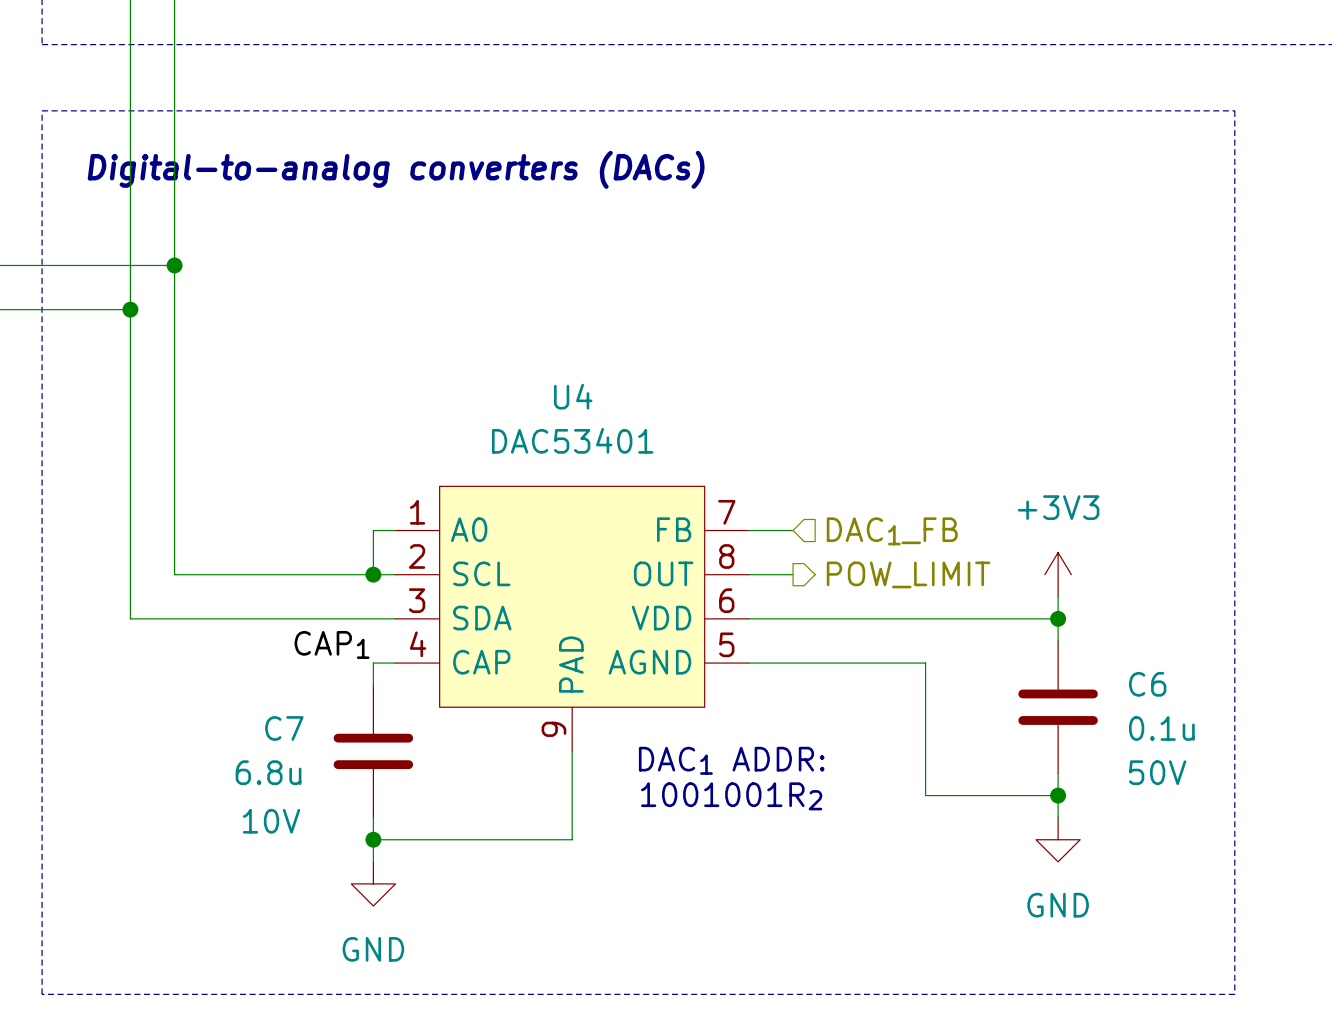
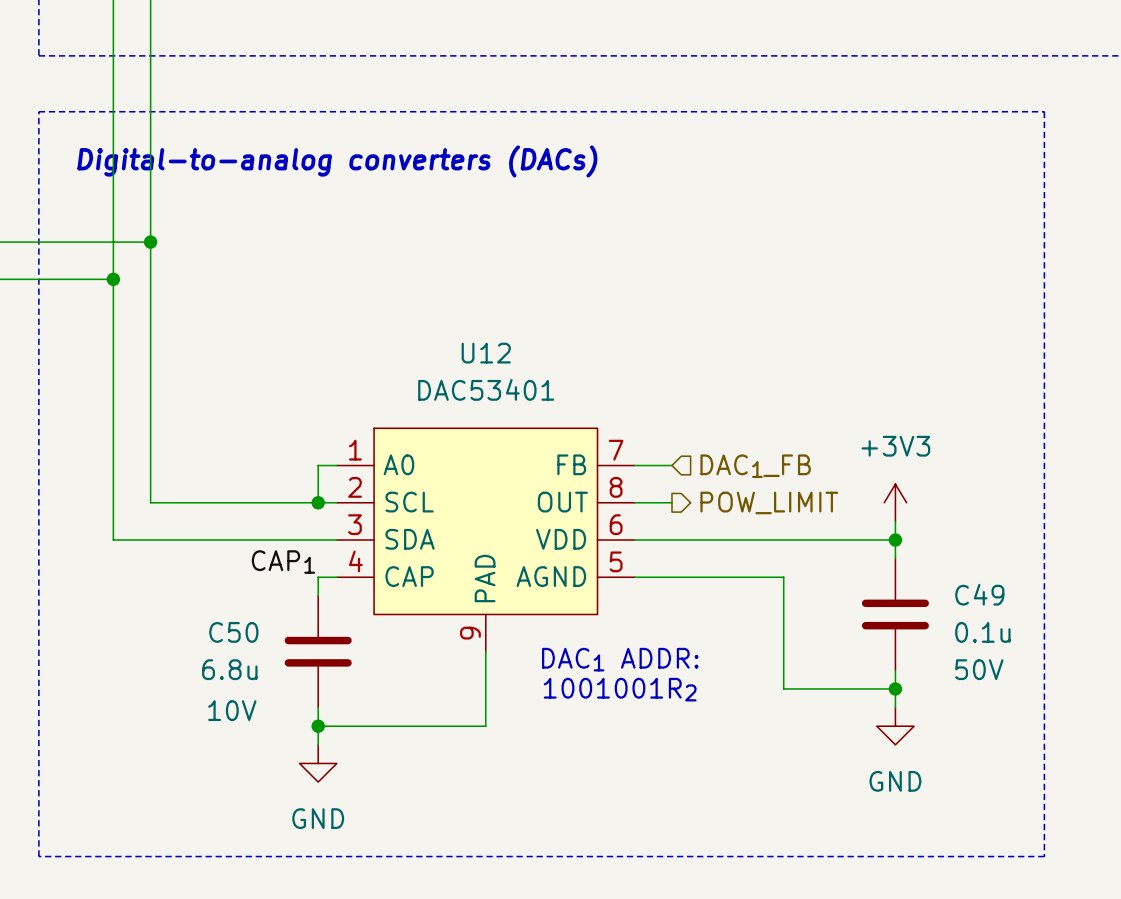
U4 name: U4 (573, 396) -> U12 (486, 353)
C6 name: C6 (1147, 684) -> C49 (979, 594)
C7 name: C7 (284, 728) -> C50 (233, 632)

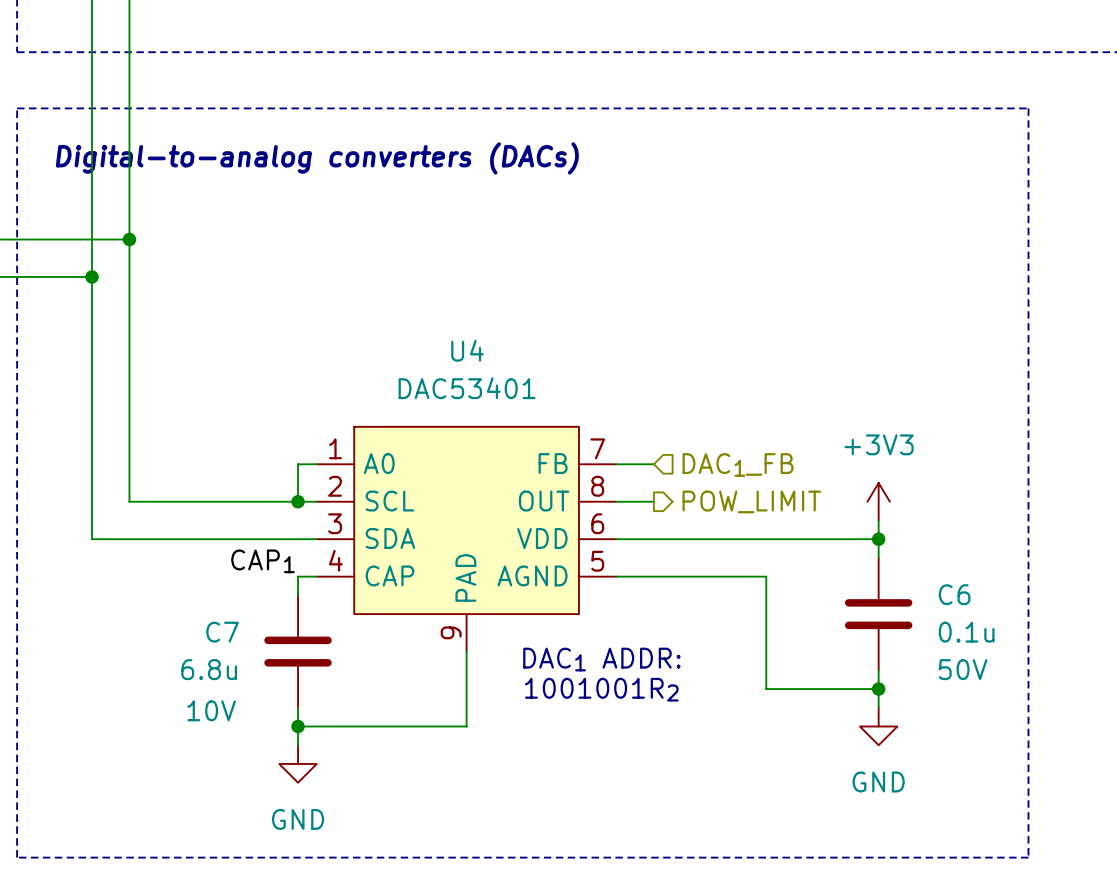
U12 name: U12 (486, 353) -> U4 (467, 350)
C49 name: C49 (979, 594) -> C6 (954, 594)
C50 name: C50 (233, 632) -> C7 (222, 632)

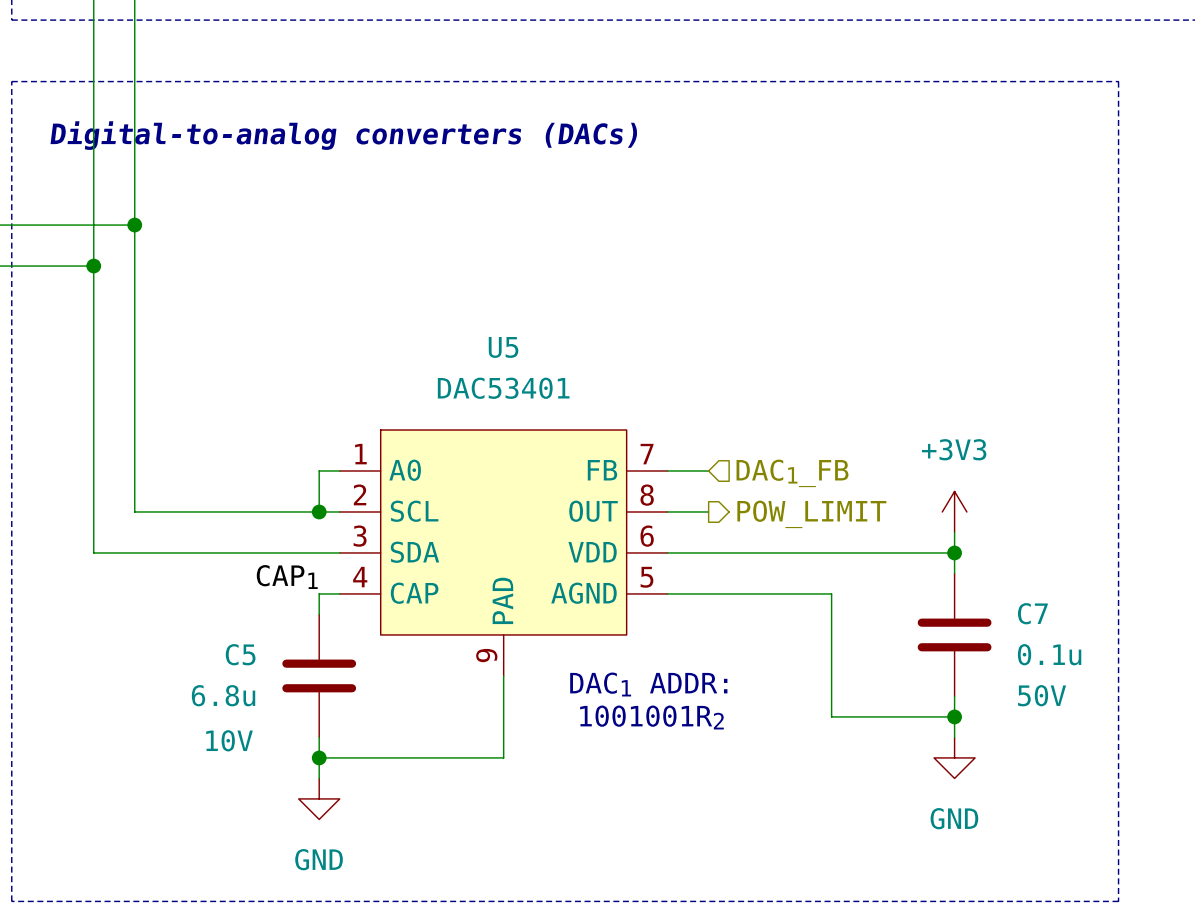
U4 name: U4 (467, 350) -> U5 (503, 347)
C6 name: C6 (954, 594) -> C7 (1032, 613)
C7 name: C7 (222, 632) -> C5 (240, 654)

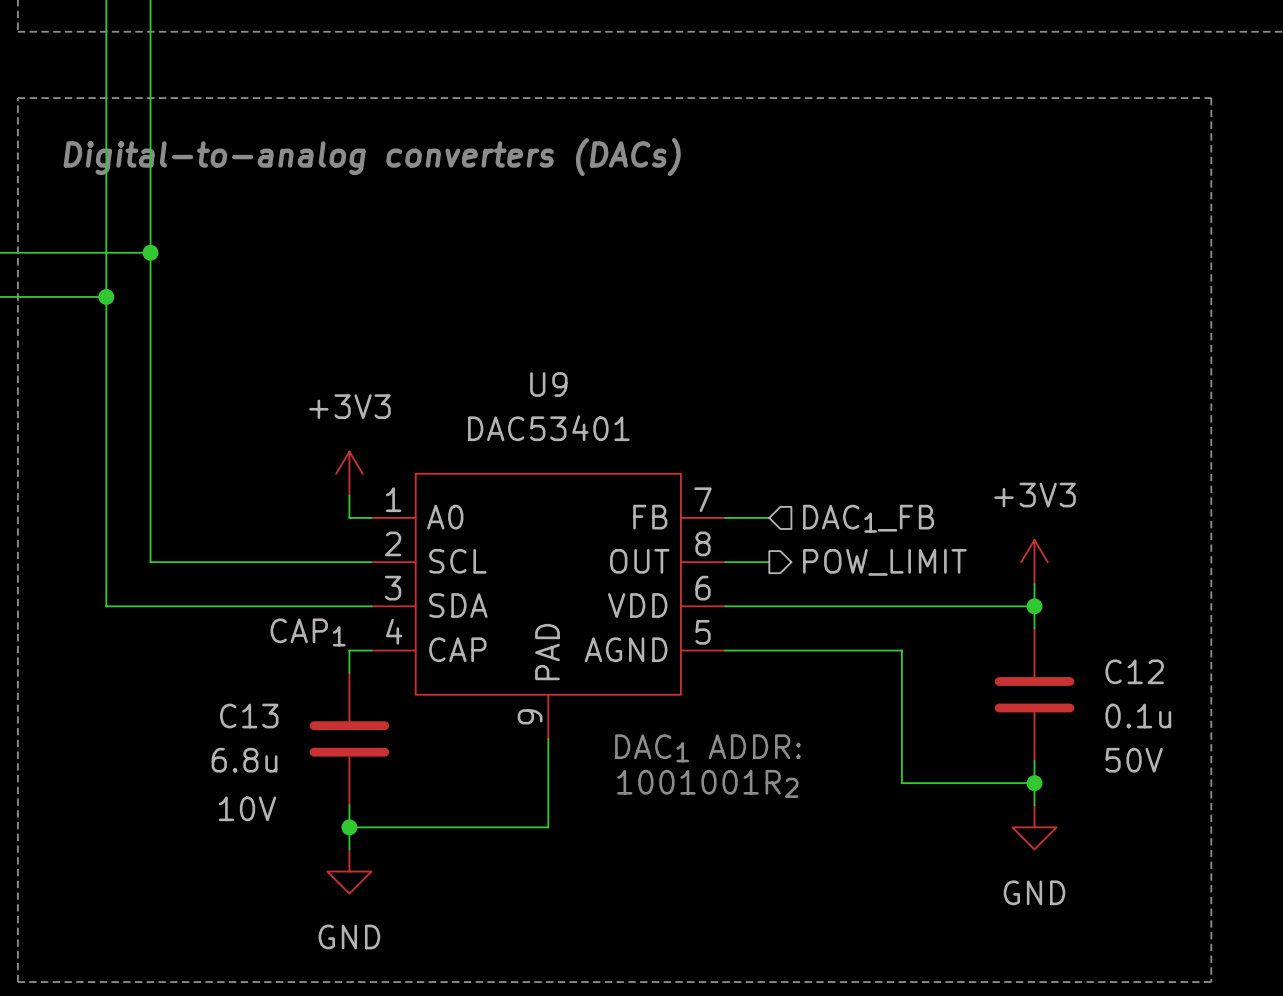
U5 name: U5 (503, 347) -> U9 (548, 384)
power symbol: none -> +3V3 (349, 473)
wire: (319, 471) (319, 511) -> (349, 517) (349, 495)
junction: (319, 511) -> none
C7 name: C7 (1032, 613) -> C12 (1134, 671)
C5 name: C5 (240, 654) -> C13 (249, 716)

